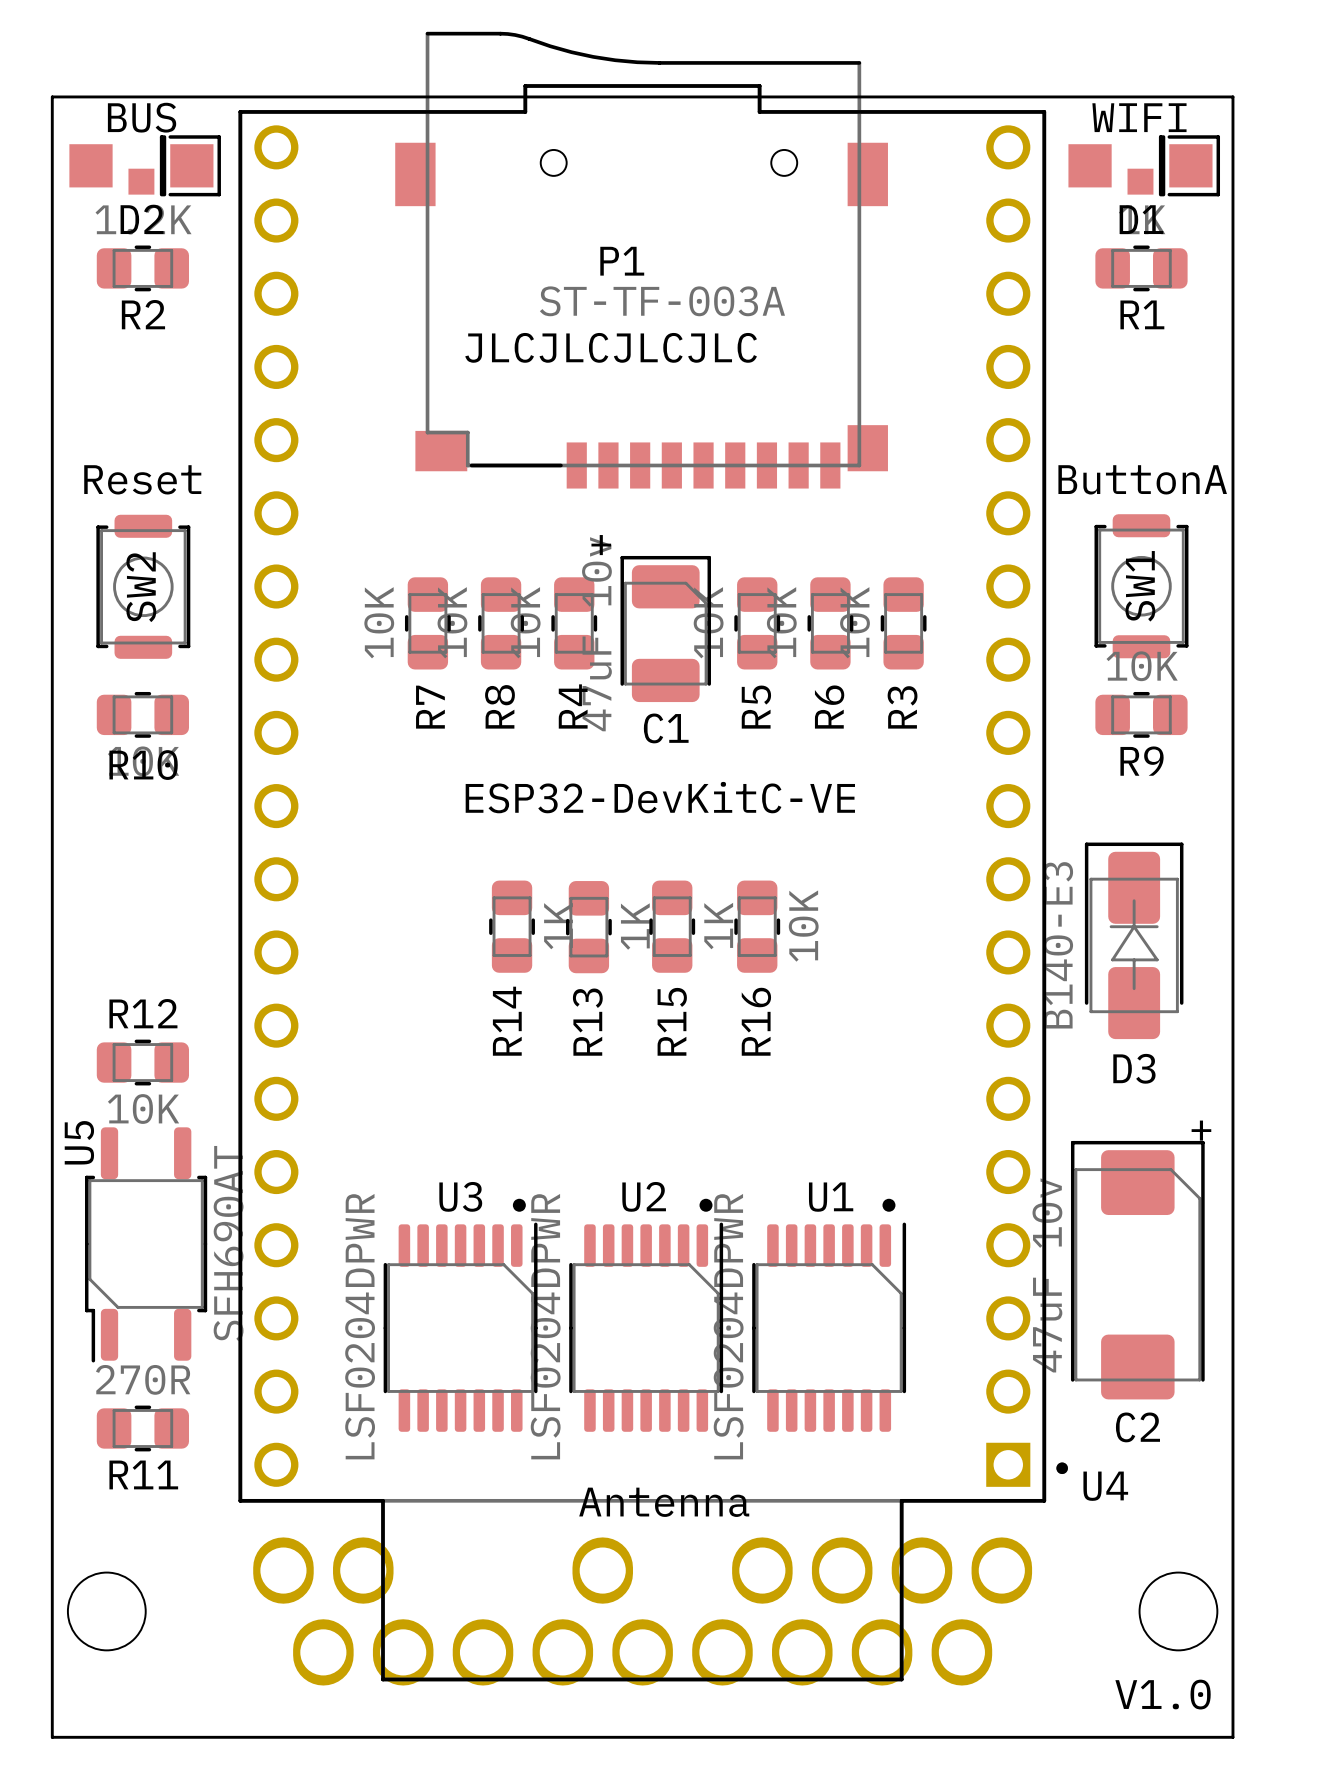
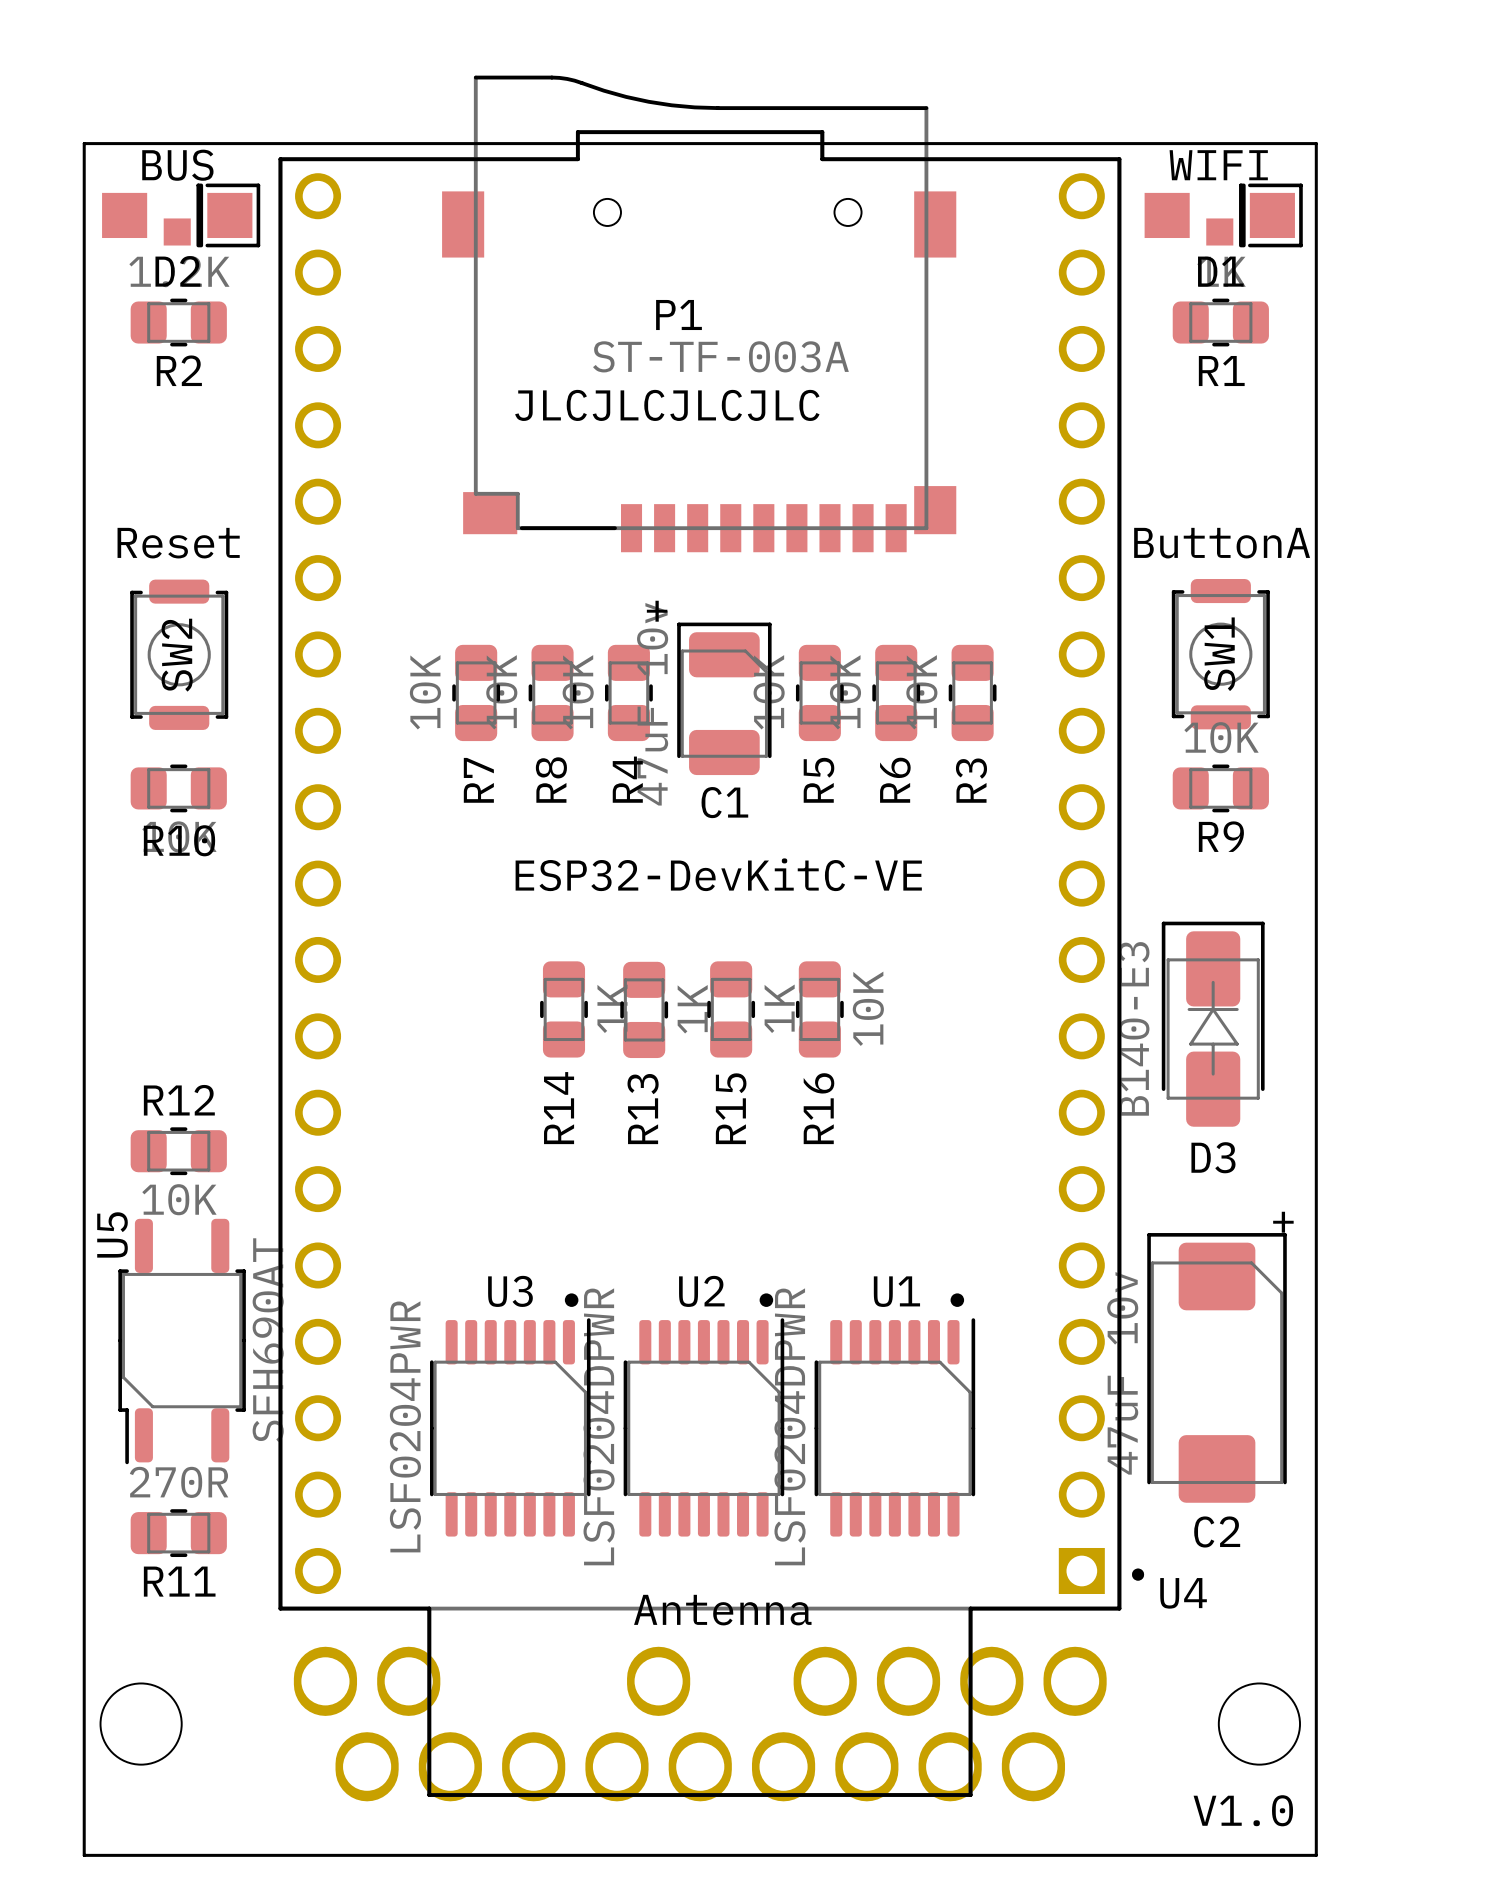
U3 value: LSF0204DPWR (360, 1326) -> LSF0204PWR (405, 1426)

